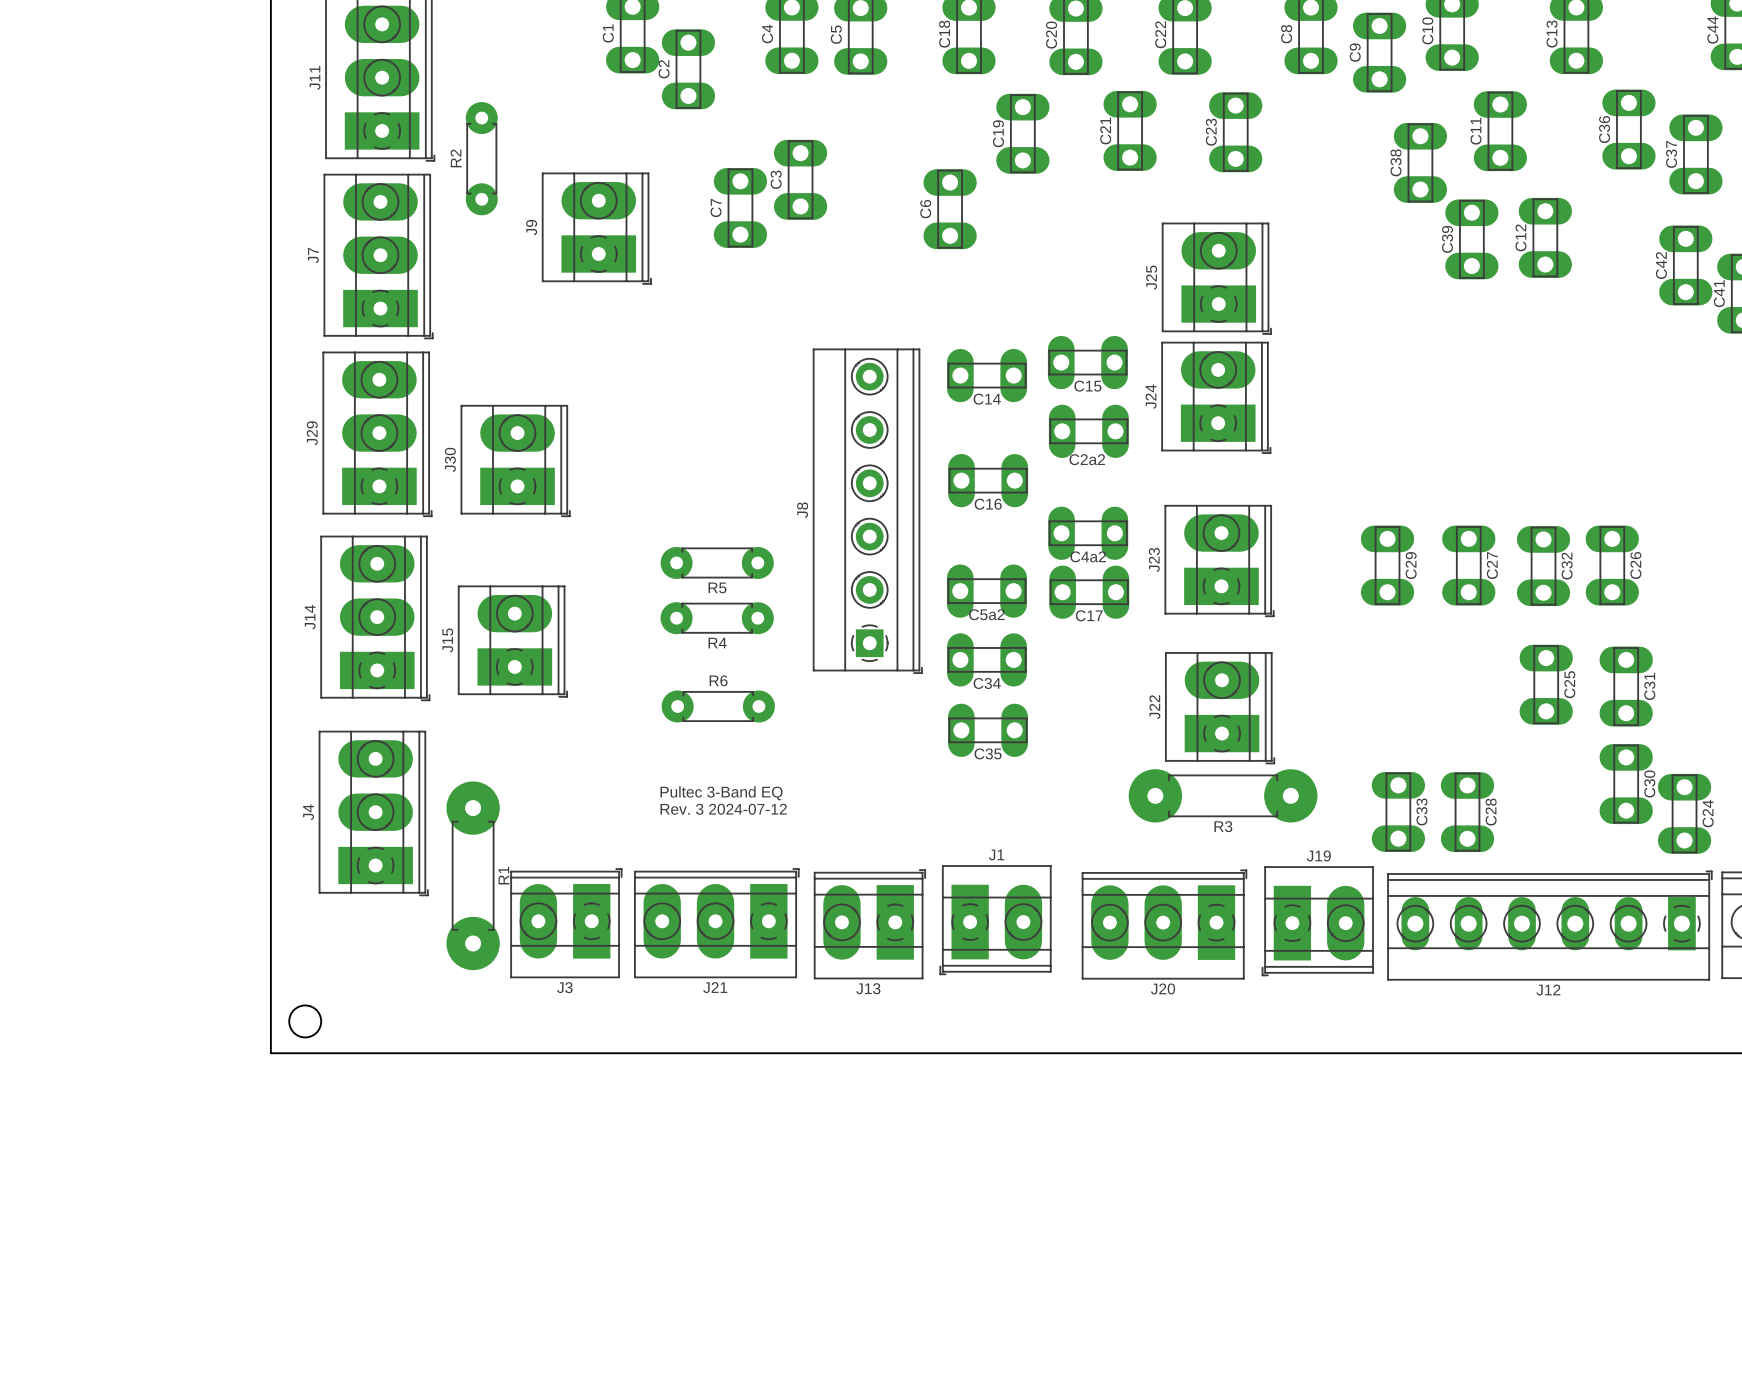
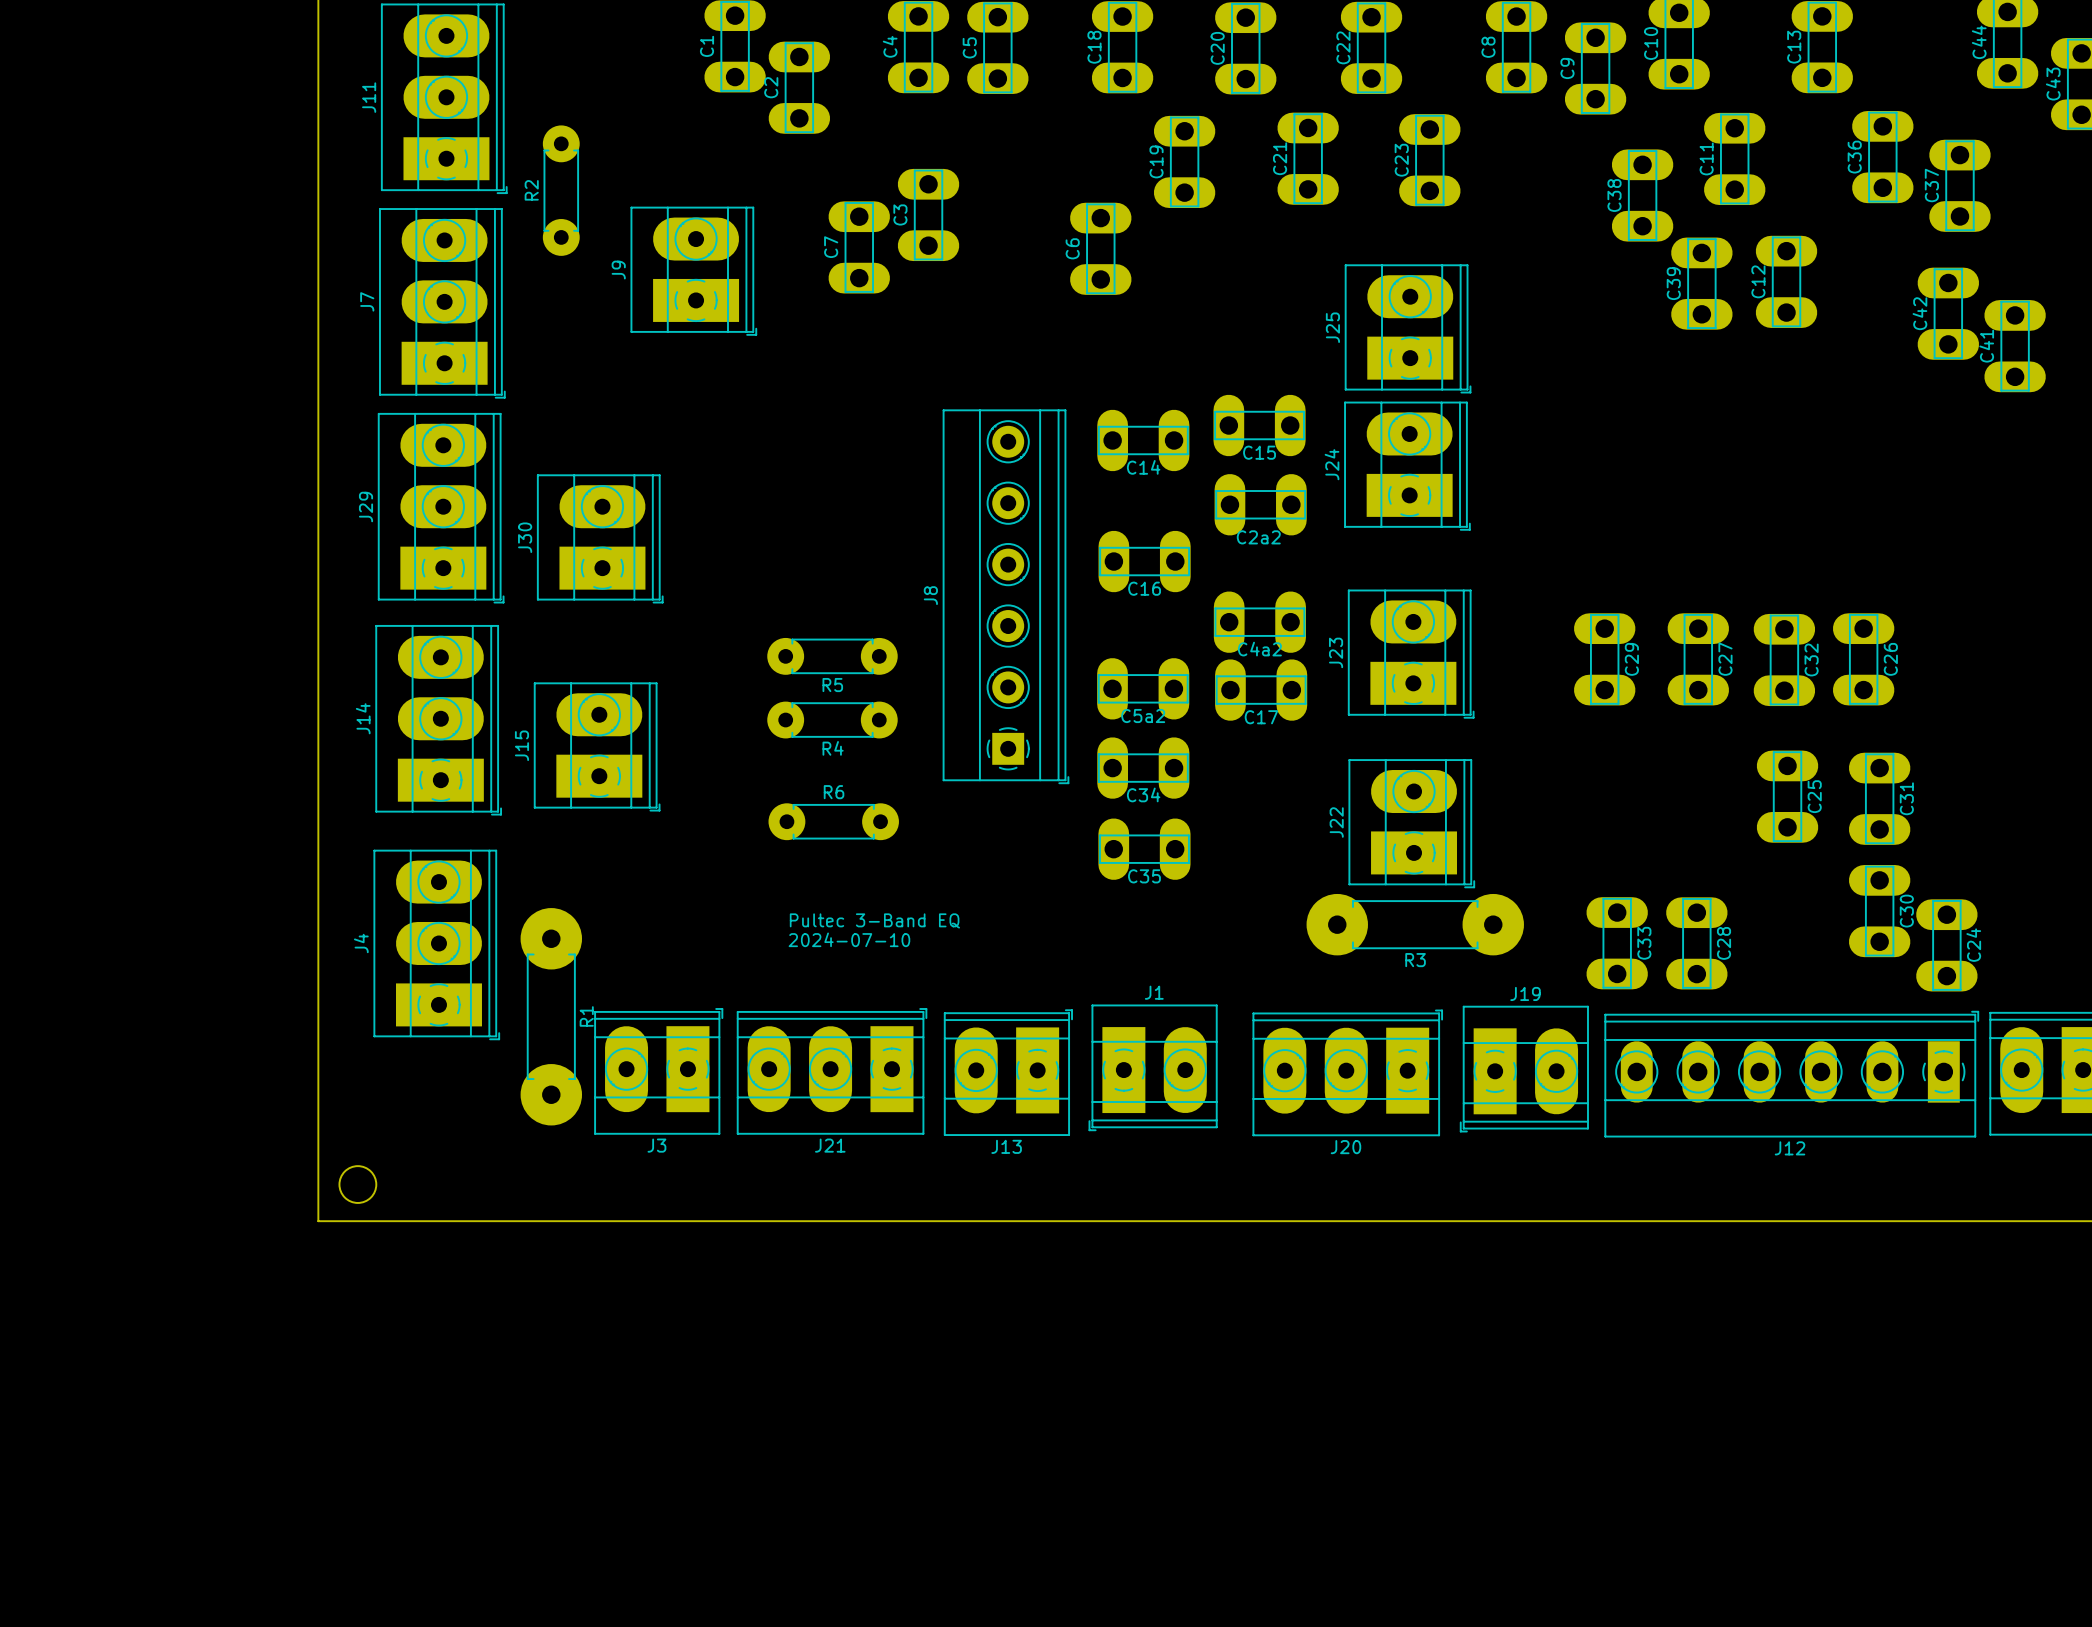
text position: Pultec 3-Band EQ (721, 793) -> Pultec 3-Band EQ (874, 920)
text: Rev. 3 2024-07-12 (723, 809) -> 2024-07-10 (849, 939)

